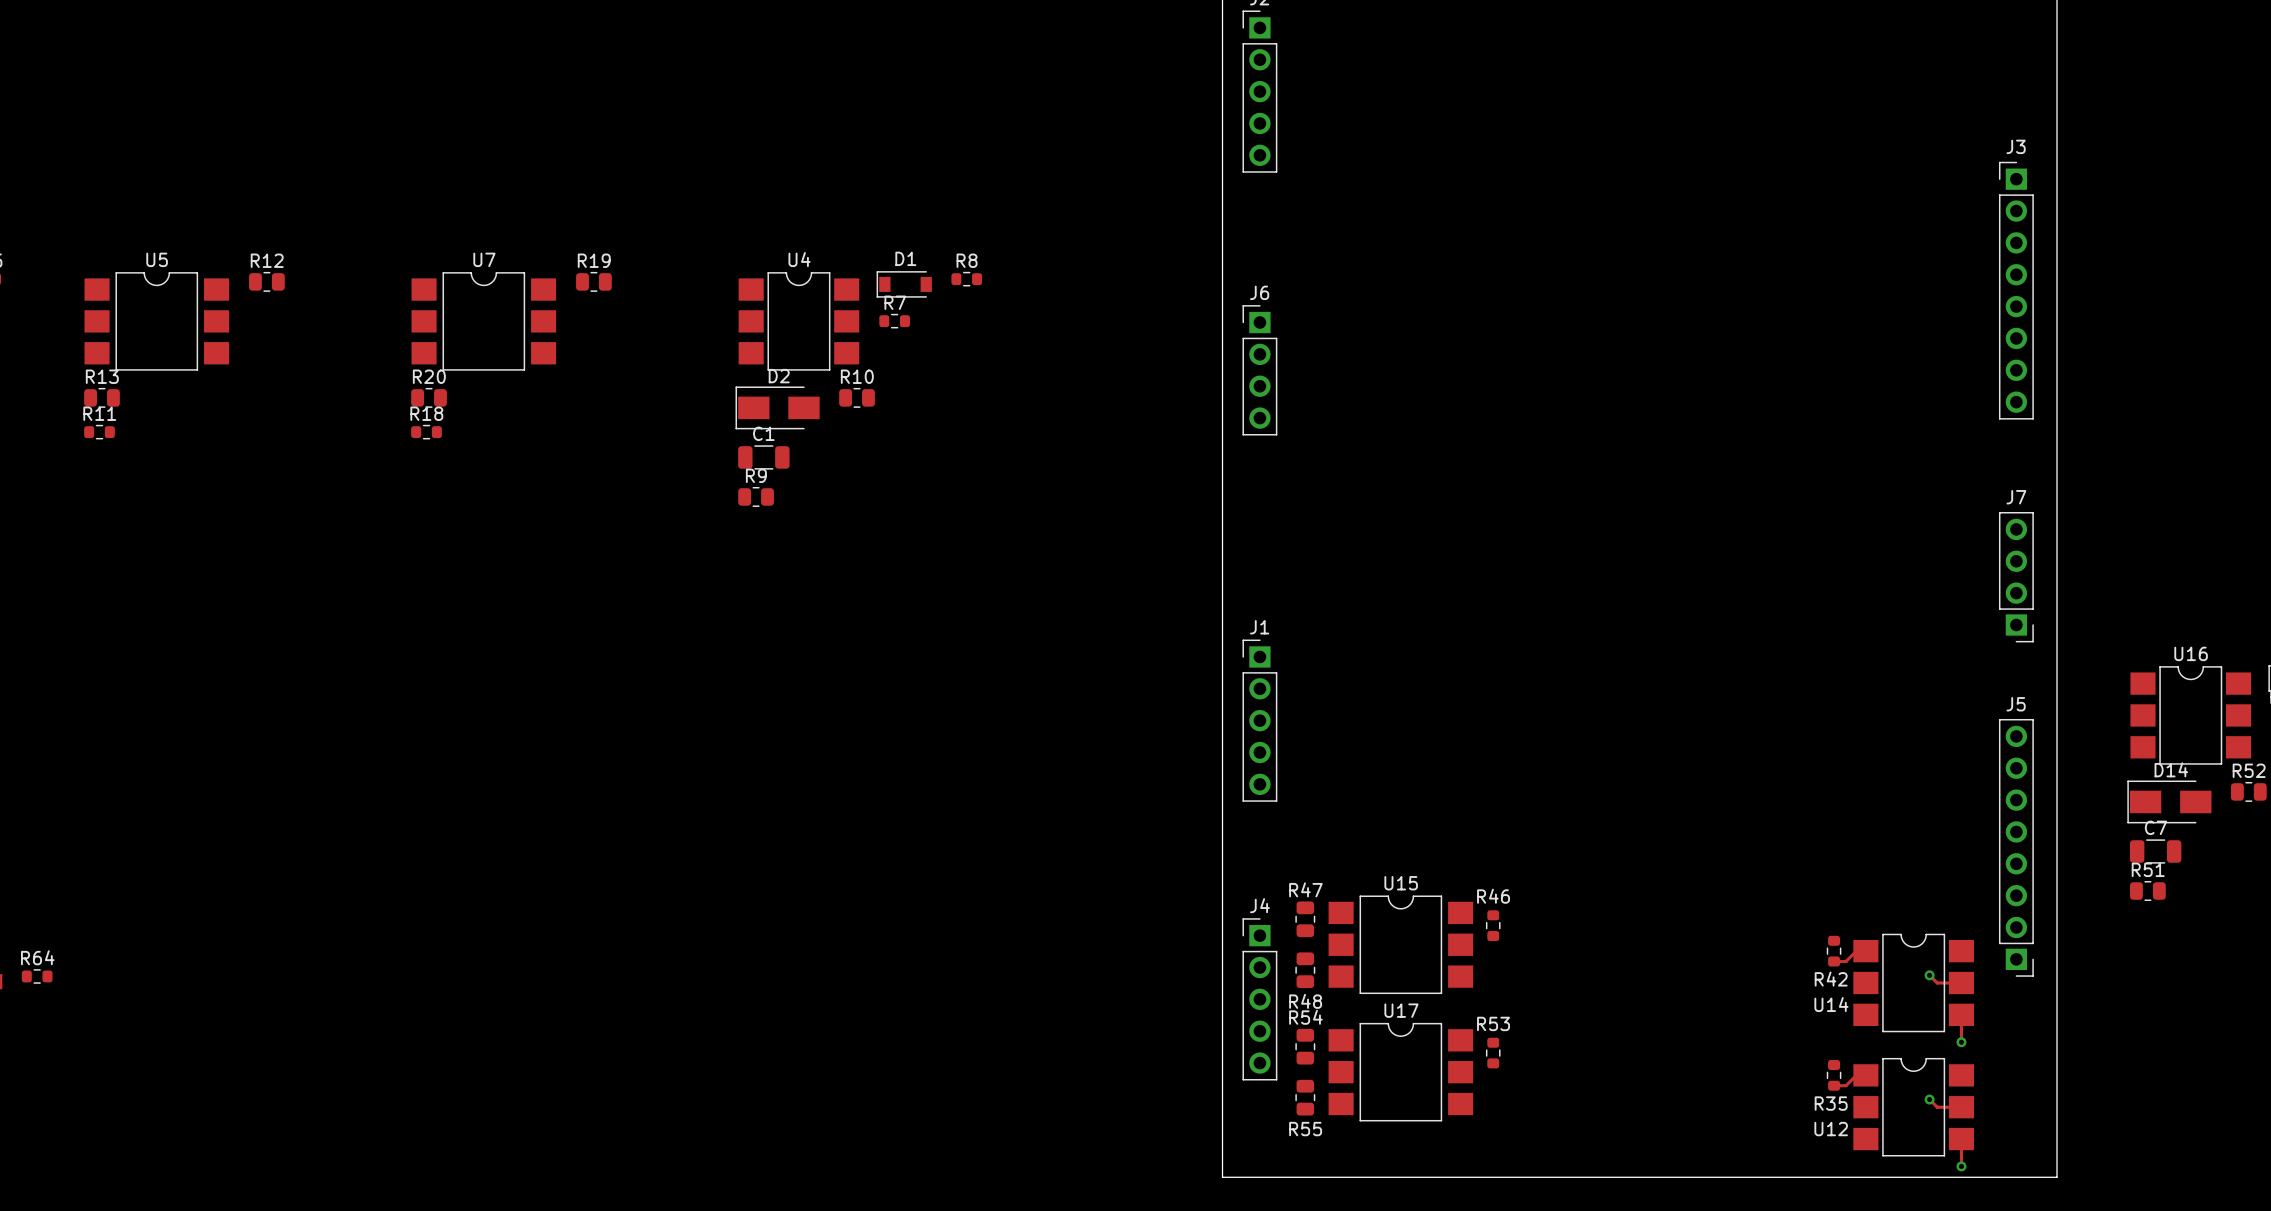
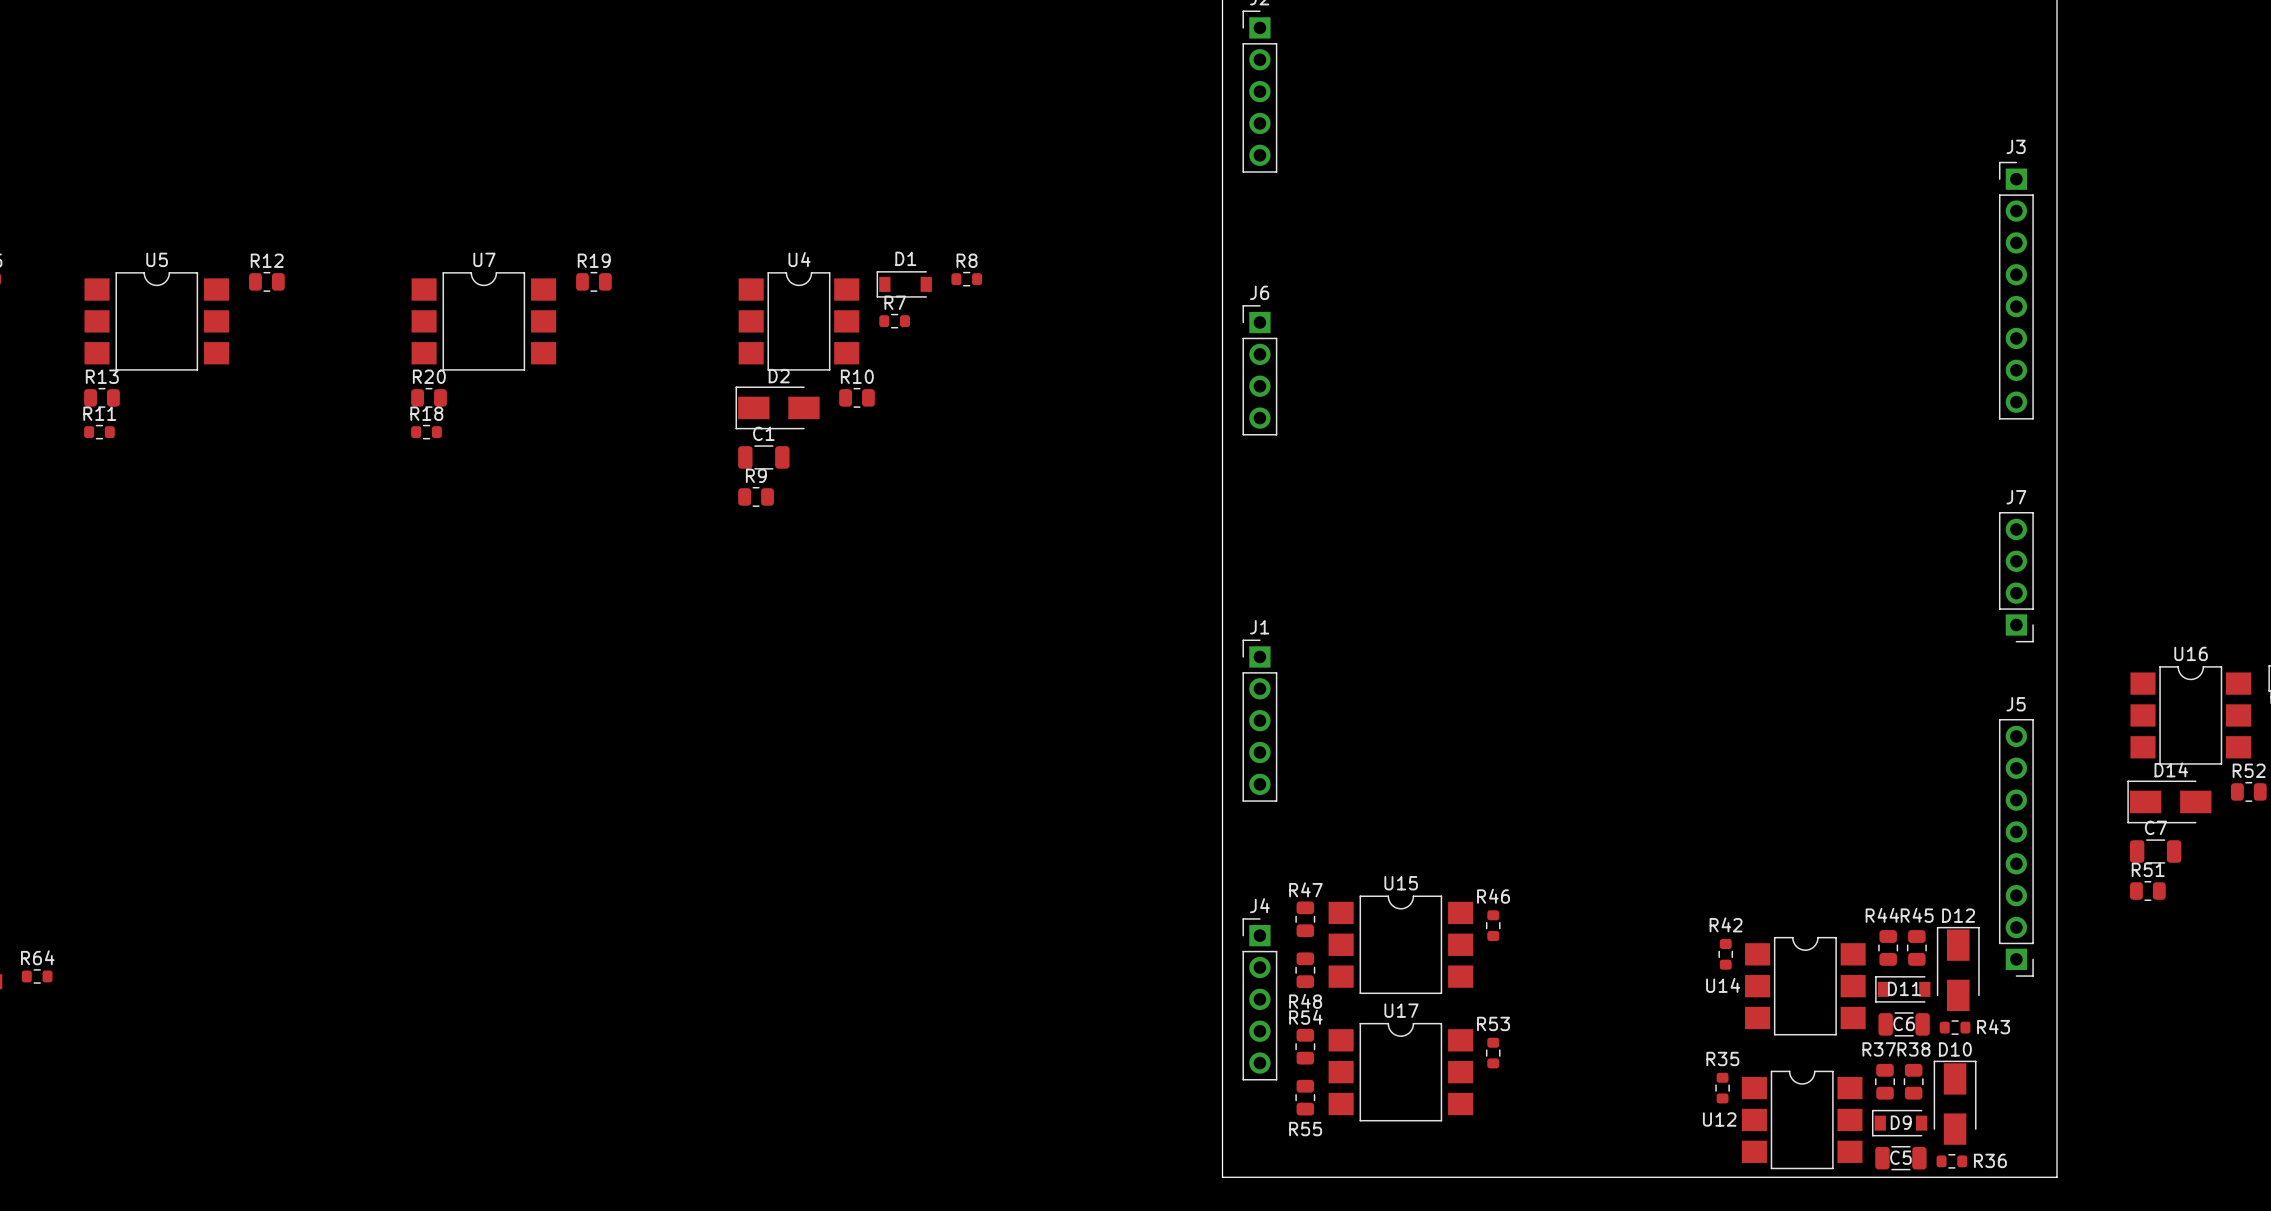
R44: none -> (1888, 947)
R45: none -> (1916, 947)
R42 position: (1834, 951) -> (1725, 954)
track: (1865, 951) (1856, 951) (1845, 961) (1834, 961) -> none
D12: none -> (1958, 968)
track: (1929, 975) (1937, 982) (1961, 982) -> none
via: (1929, 975) -> none
R42 name position: R42 (1831, 979) -> R42 (1726, 924)
U14 position: (1913, 982) -> (1805, 986)
D11: none -> (1902, 989)
U14 name position: U14 (1831, 1004) -> U14 (1723, 985)
track: (1961, 1014) (1961, 1042) -> none
C6: none -> (1904, 1024)
R43: none -> (1955, 1027)
via: (1961, 1042) -> none
R35 position: (1834, 1075) -> (1722, 1088)
track: (1865, 1075) (1856, 1075) (1845, 1085) (1834, 1085) -> none
R37: none -> (1885, 1081)
R38: none -> (1913, 1081)
track: (1929, 1099) (1937, 1107) (1961, 1107) -> none
via: (1929, 1099) -> none
D10: none -> (1955, 1102)
R35 name position: R35 (1831, 1103) -> R35 (1722, 1058)
U12 position: (1913, 1107) -> (1802, 1119)
D9: none -> (1899, 1123)
U12 name position: U12 (1831, 1129) -> U12 (1719, 1119)
track: (1961, 1139) (1961, 1166) -> none
C5: none -> (1900, 1158)
R36: none -> (1951, 1161)
via: (1961, 1166) -> none

